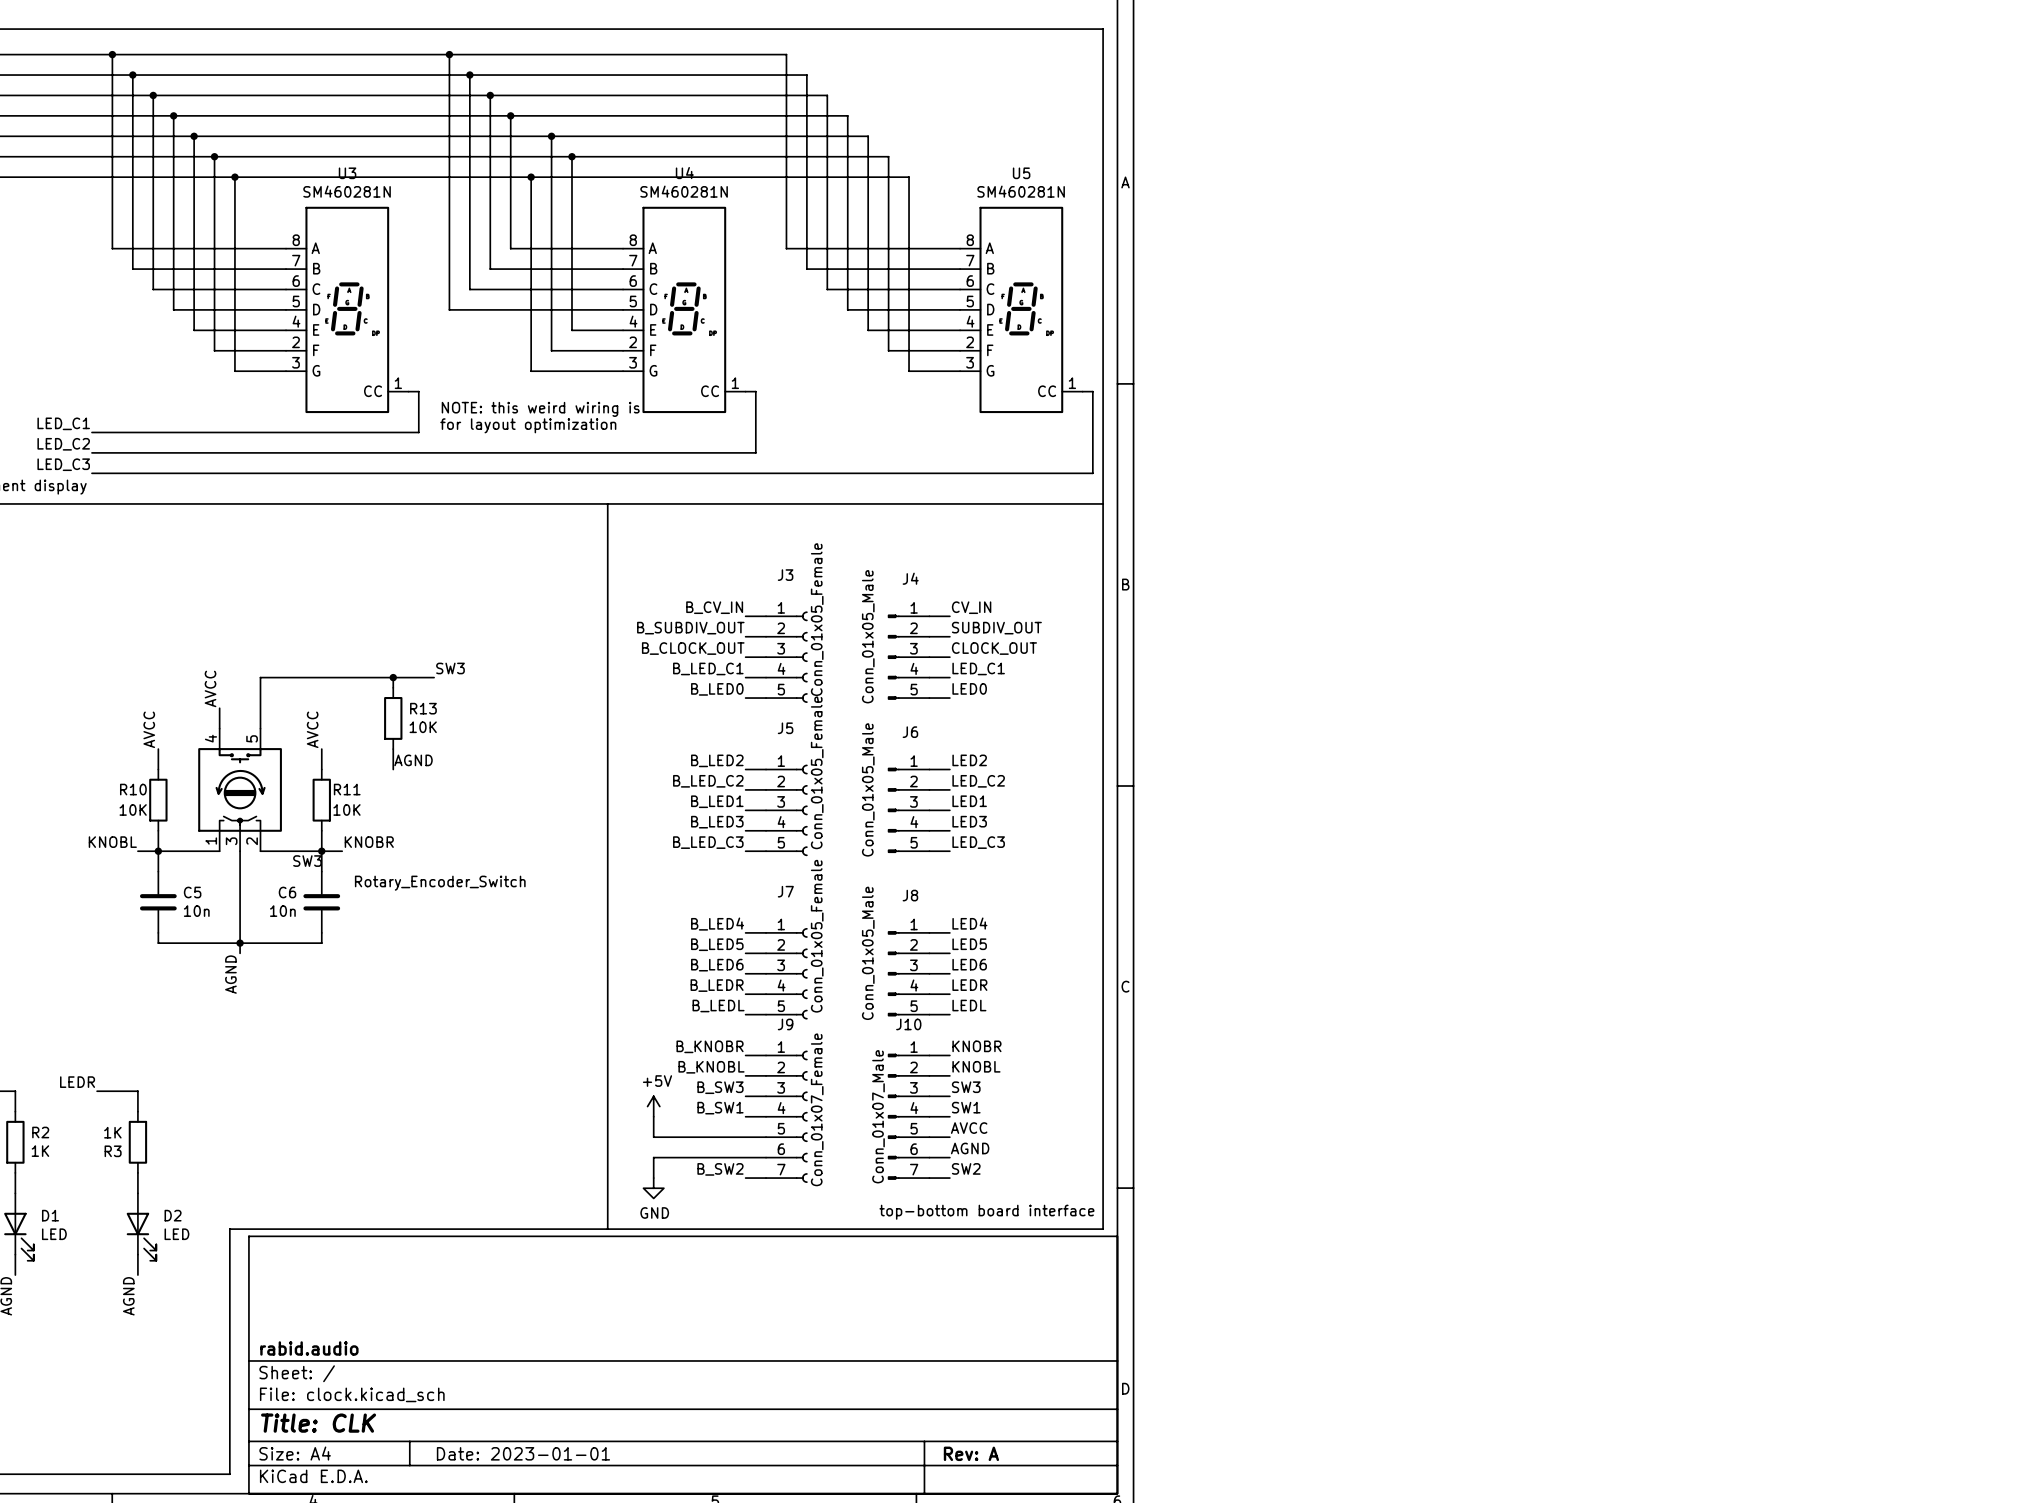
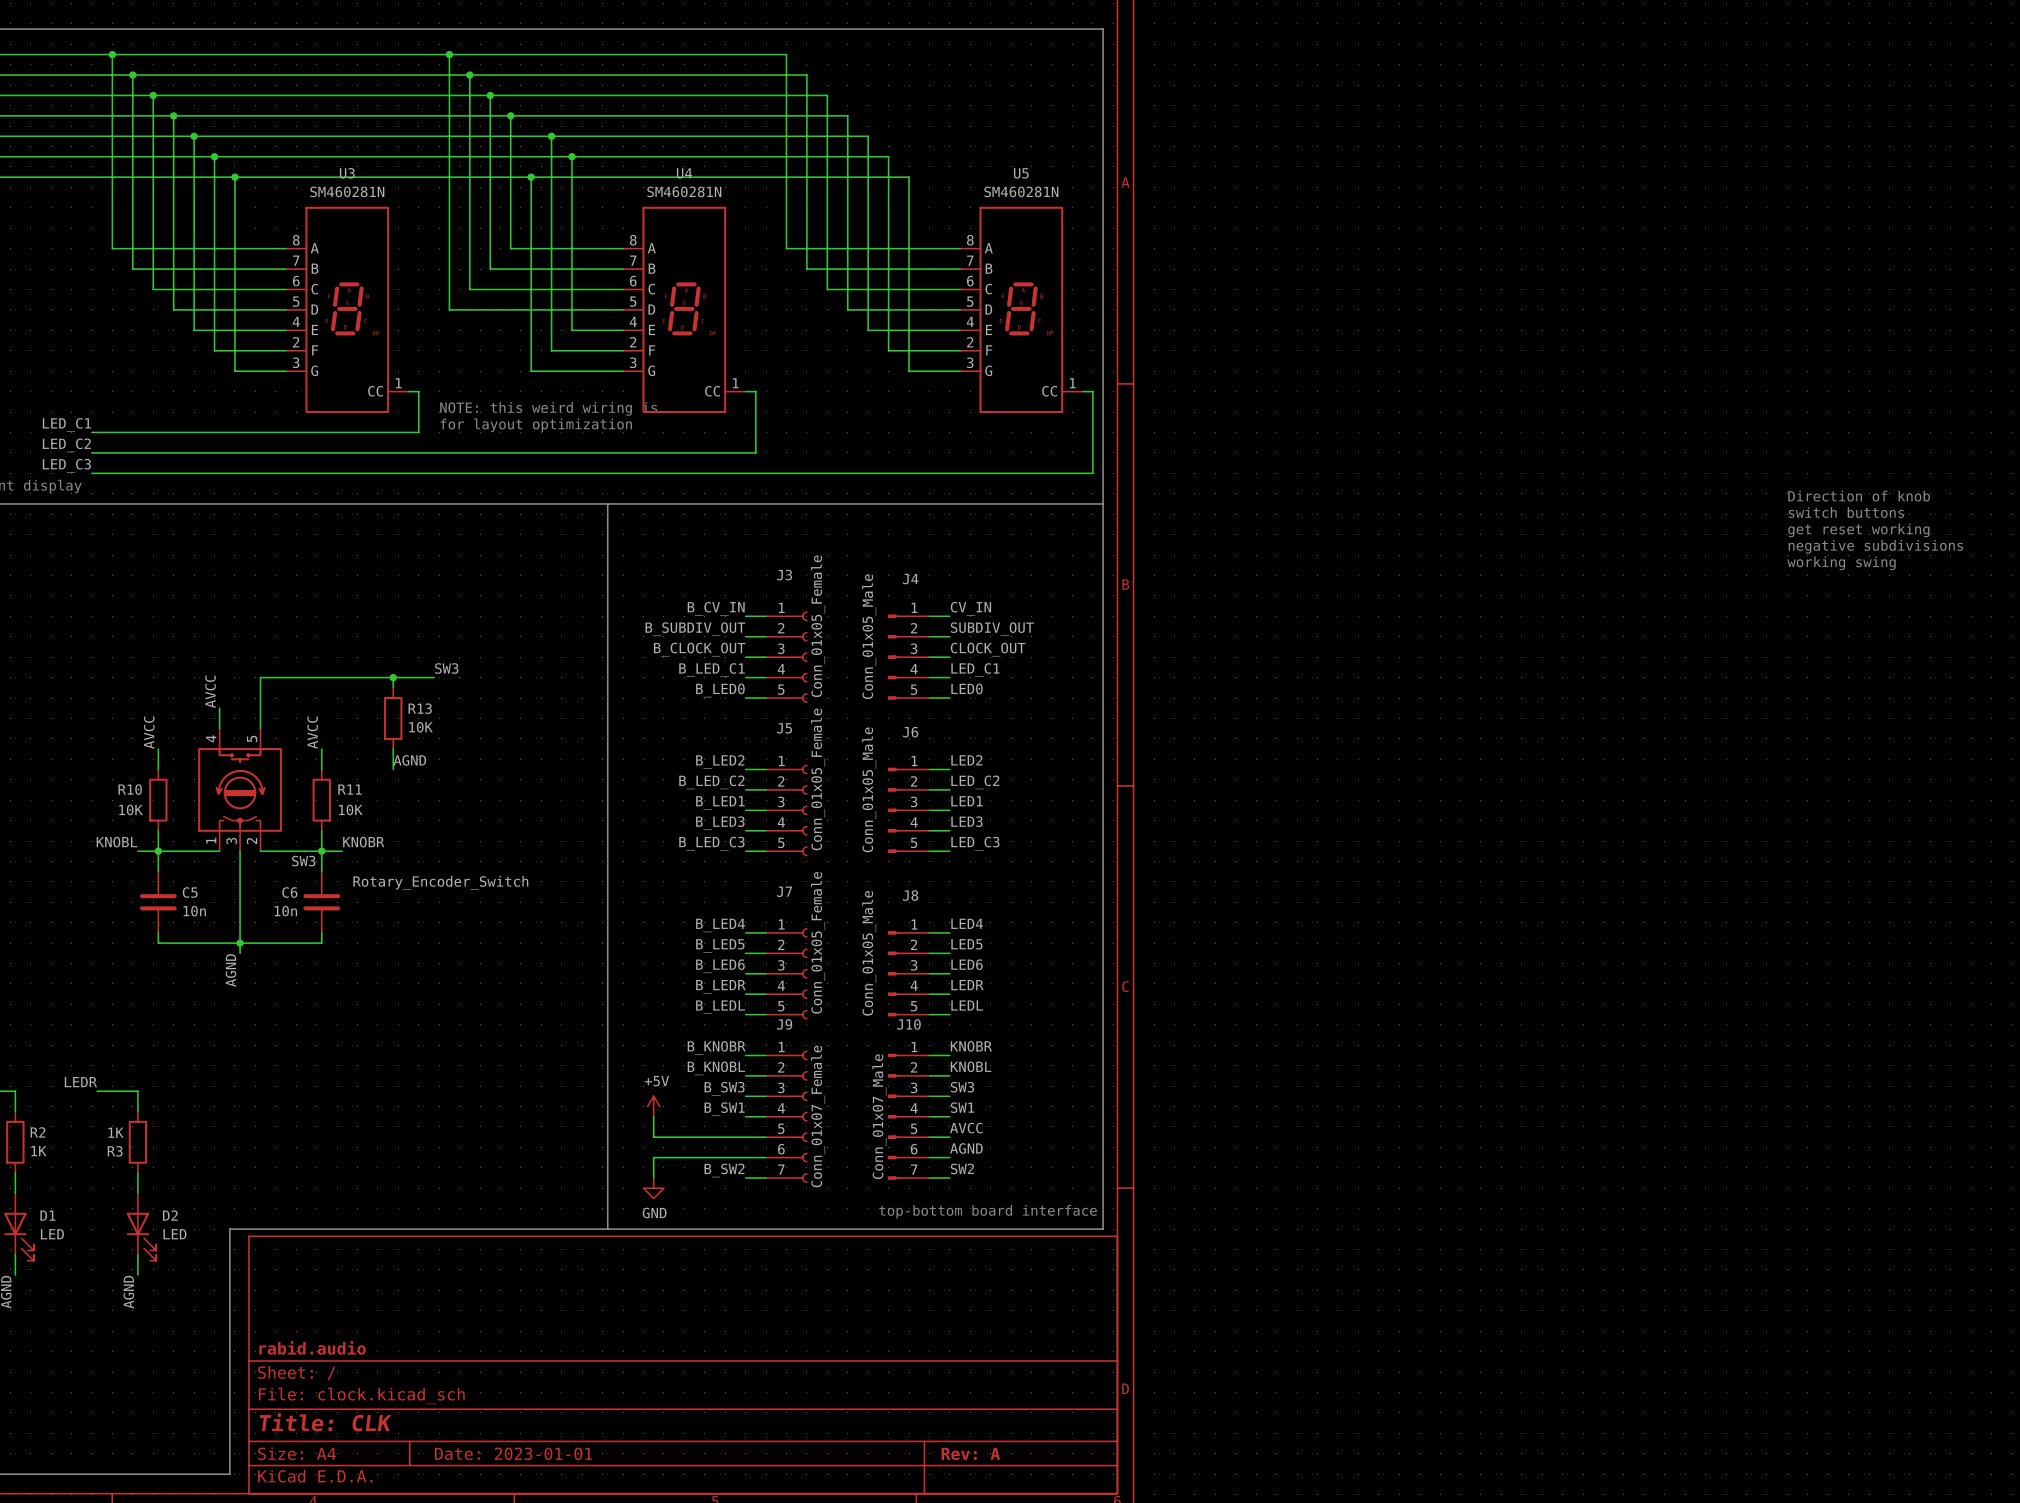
text: none -> Direction of knob (1859, 496)
text: none -> switch buttons (1846, 512)
text: none -> get reset working (1858, 530)
text: none -> negative subdivisions (1875, 546)
text: none -> working swing (1841, 563)

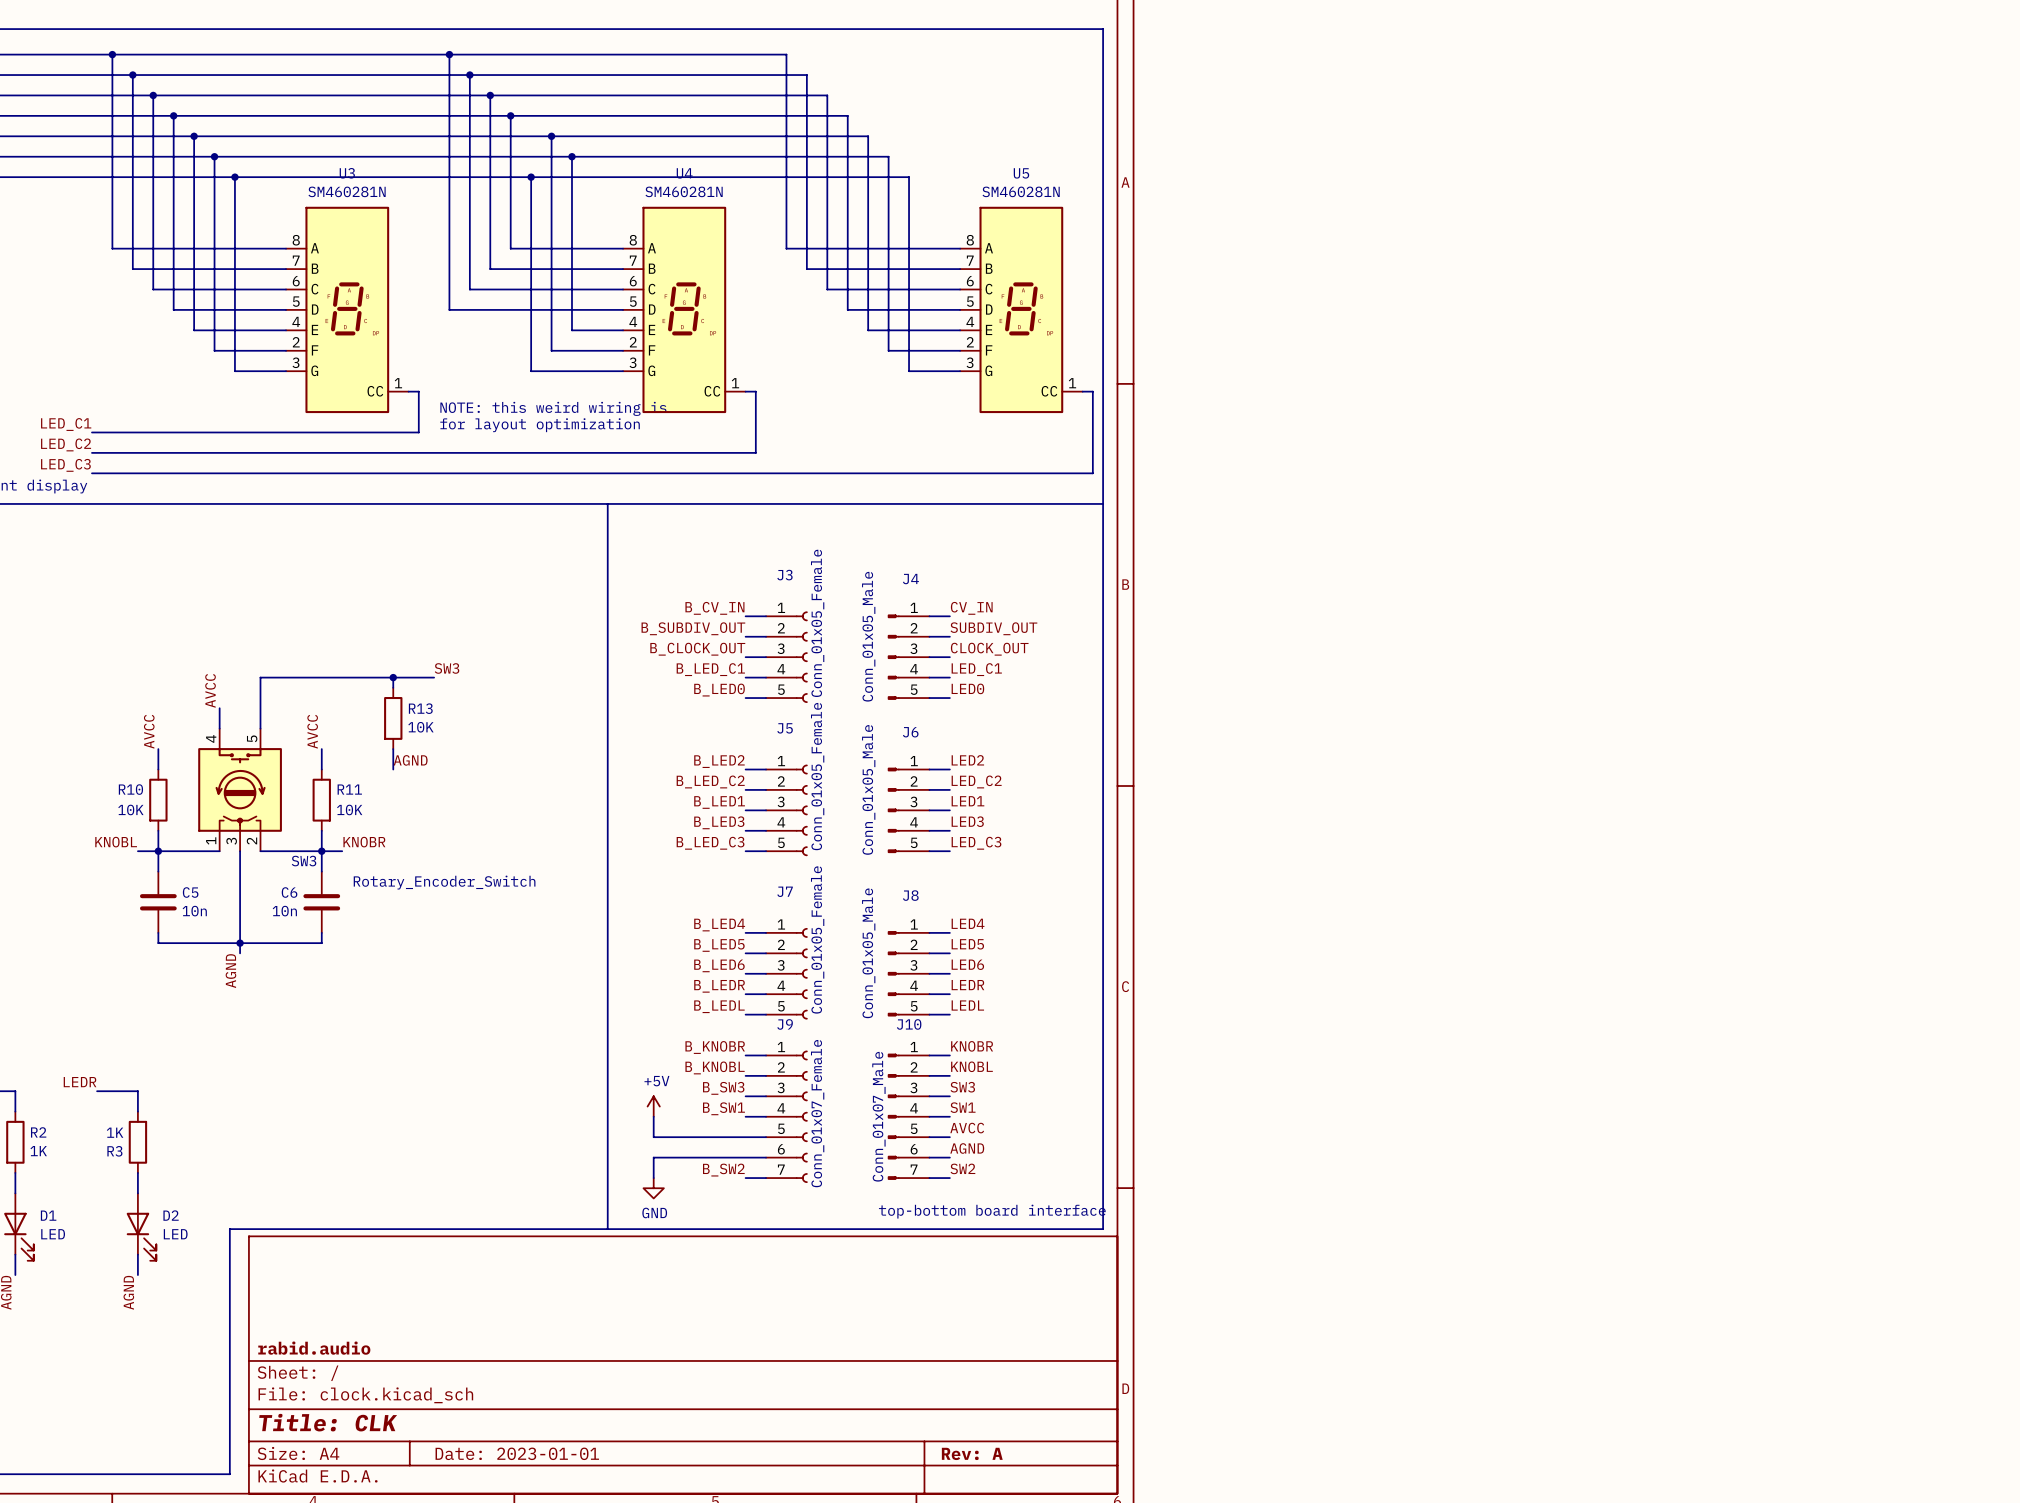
text: Direction of knob (1859, 496) -> none
text: switch buttons (1846, 512) -> none
text: get reset working (1858, 530) -> none
text: negative subdivisions (1875, 546) -> none
text: working swing (1841, 563) -> none

